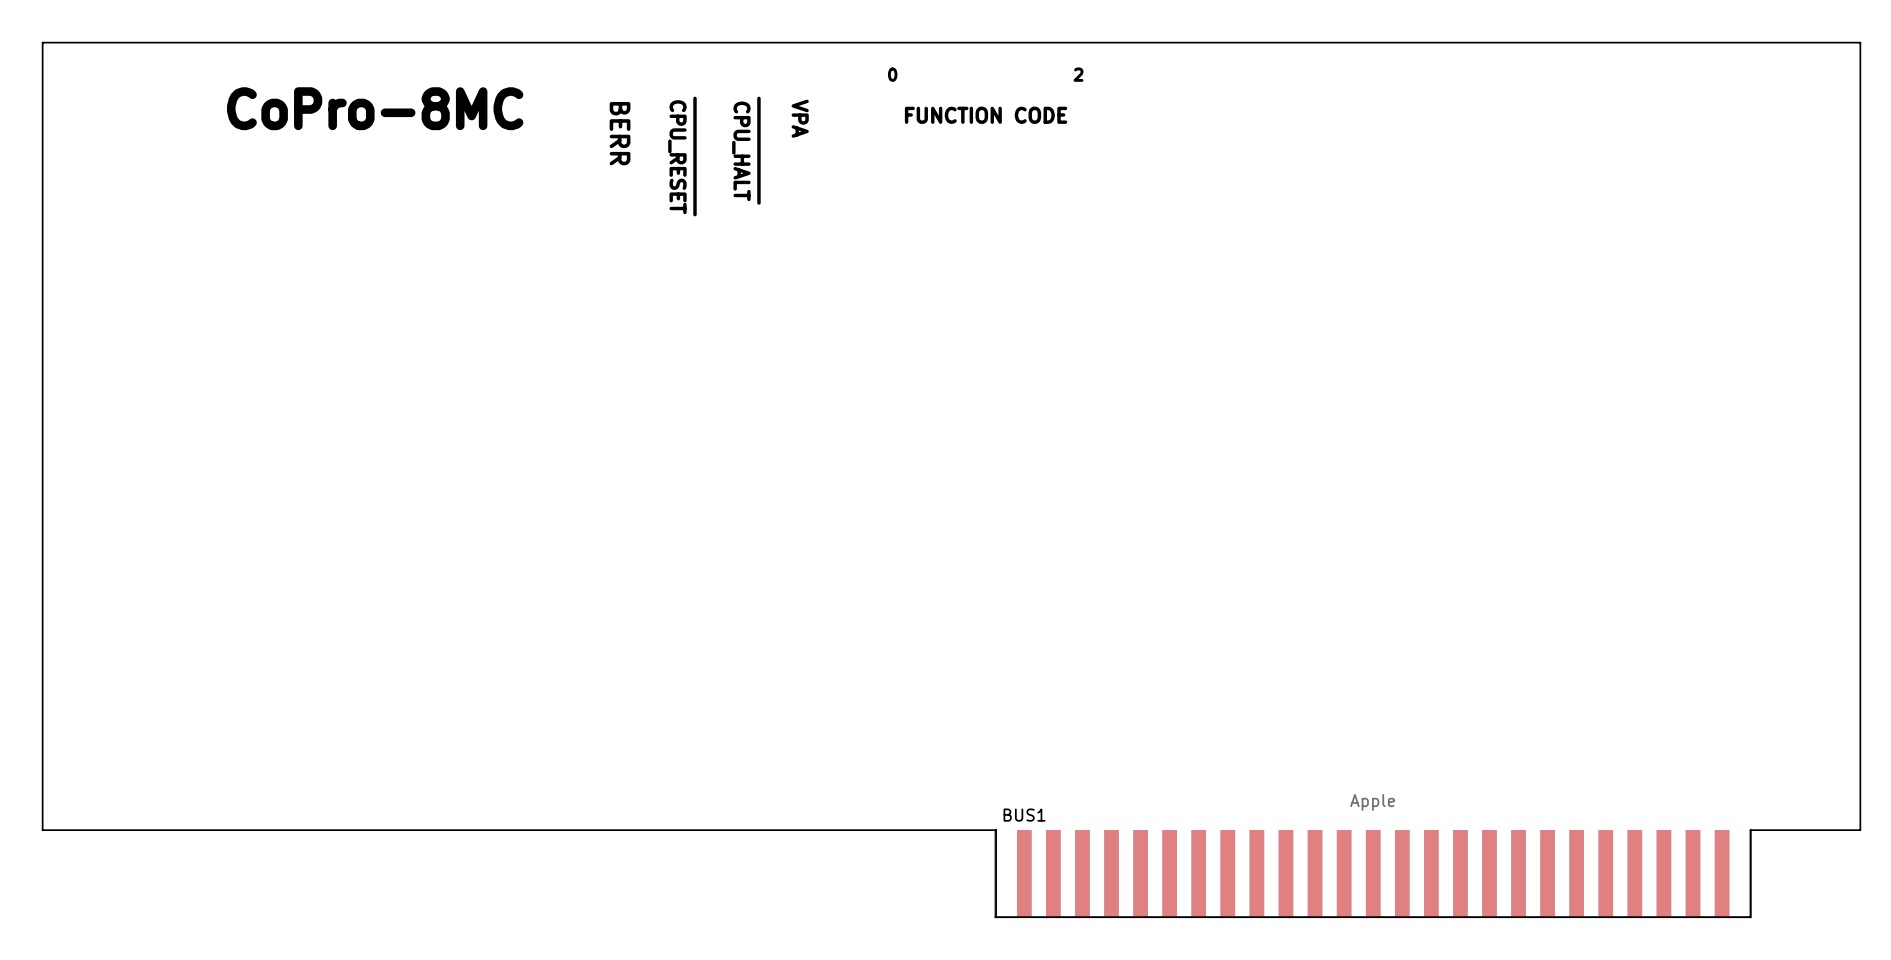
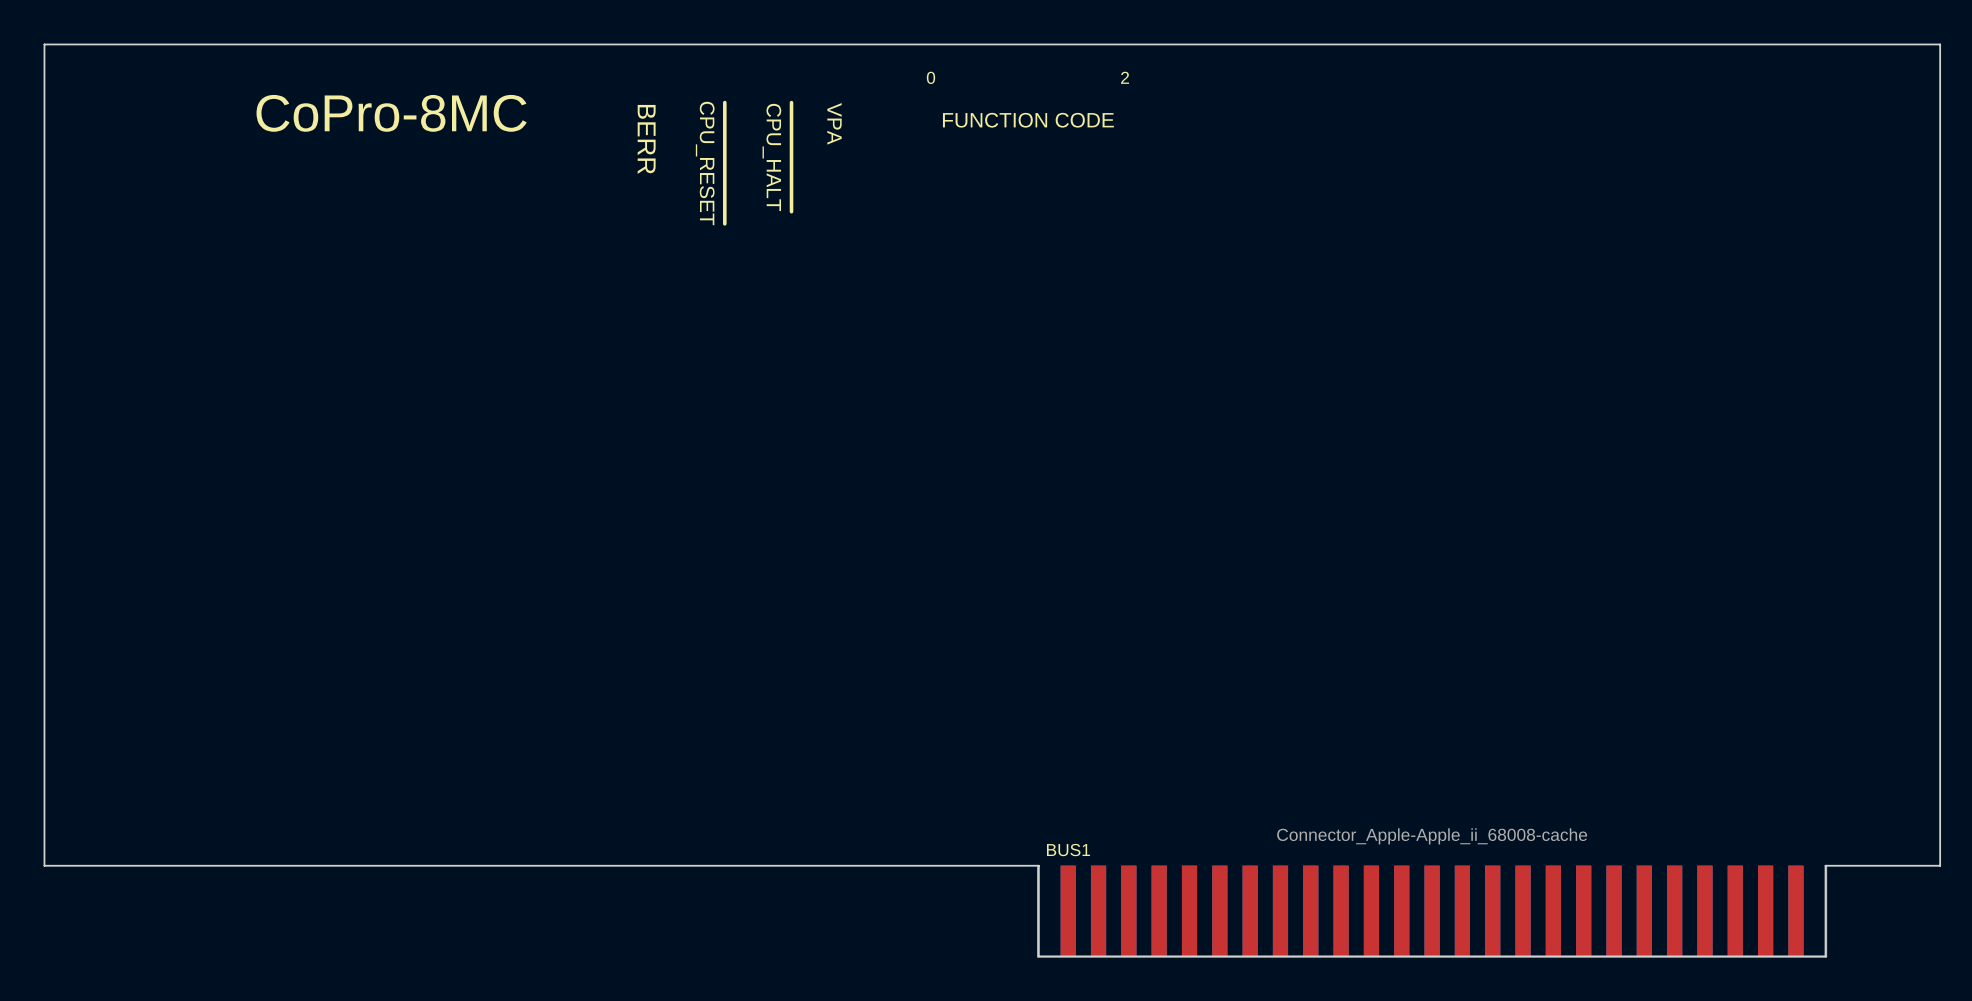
BUS1 value: Apple (1372, 802) -> Connector_Apple-Apple_ii_68008-cache (1432, 836)

